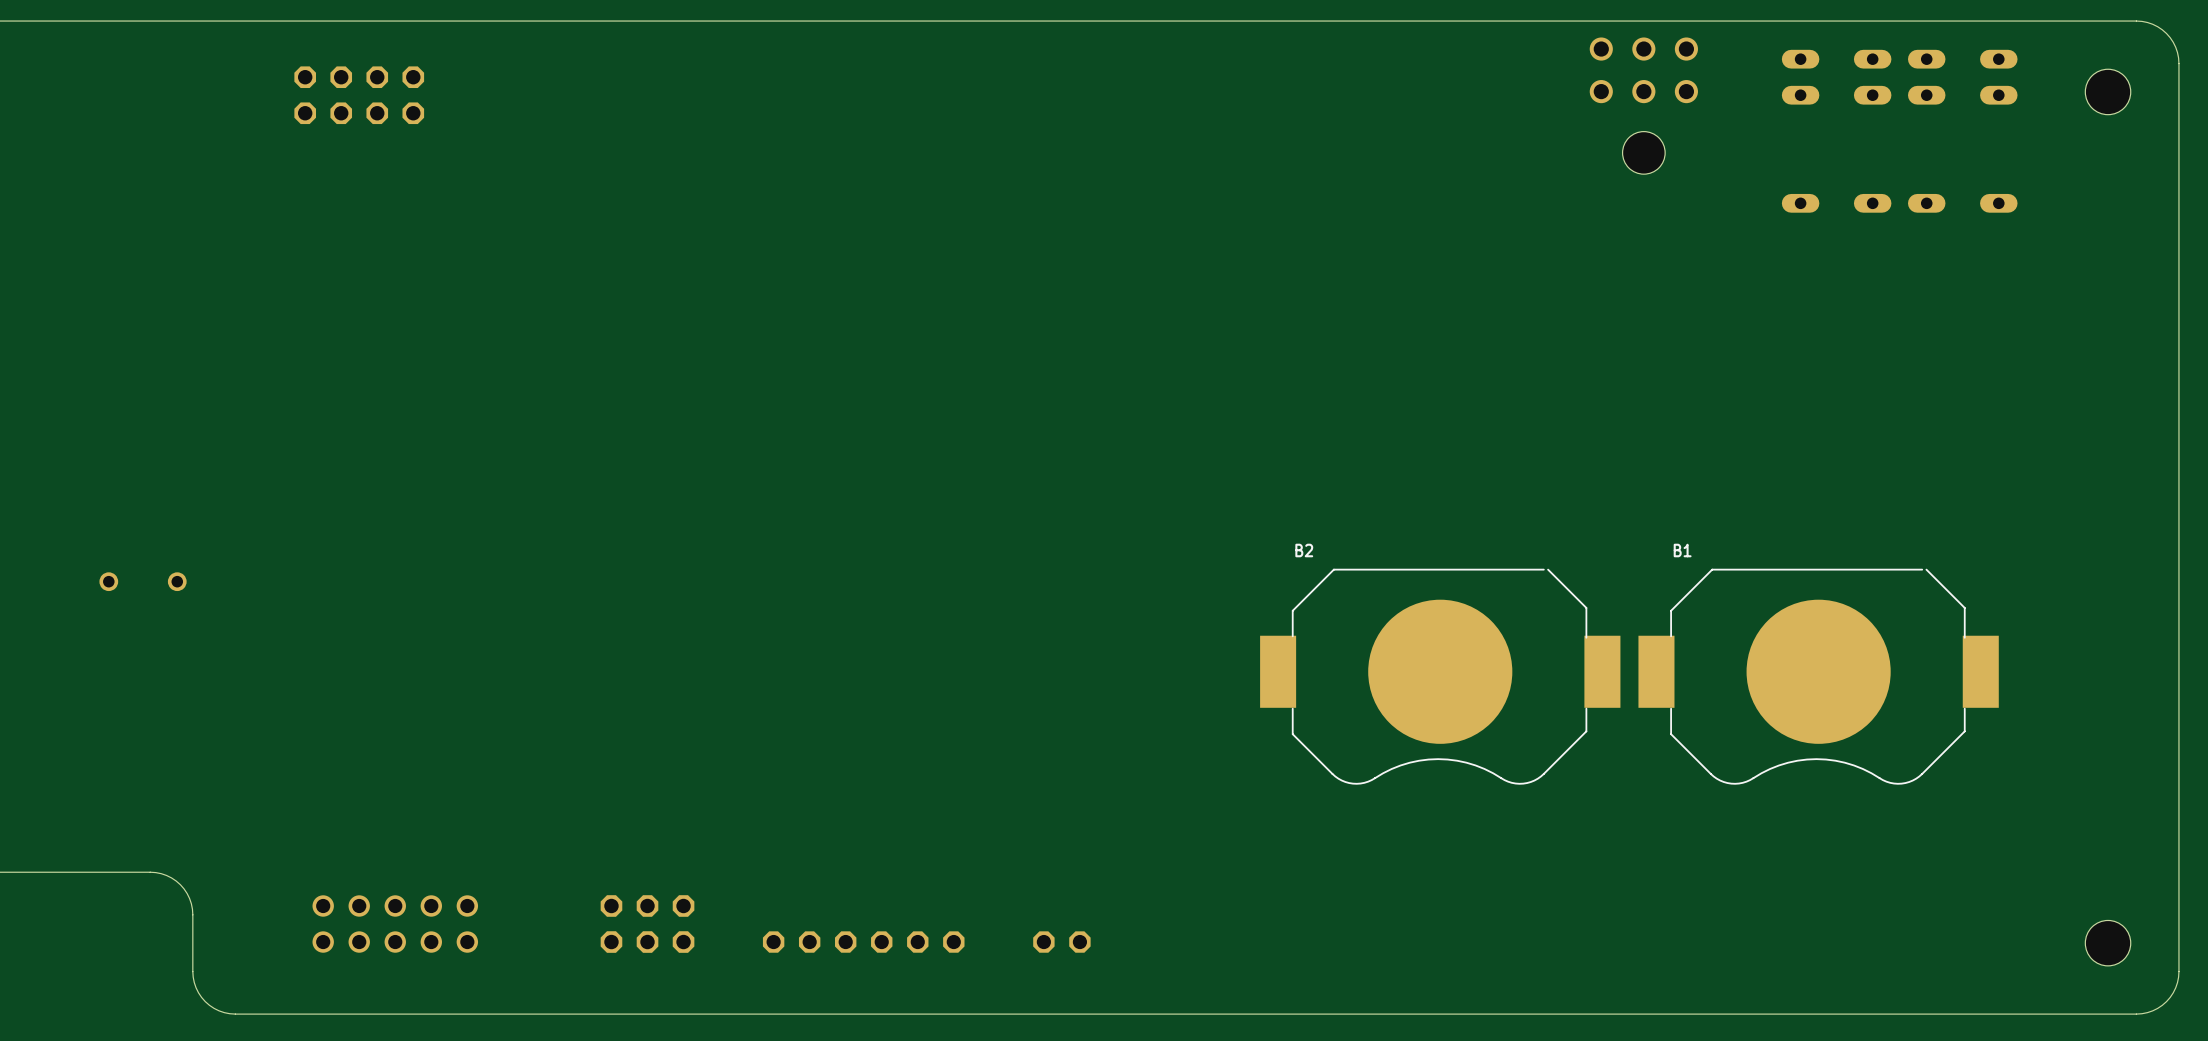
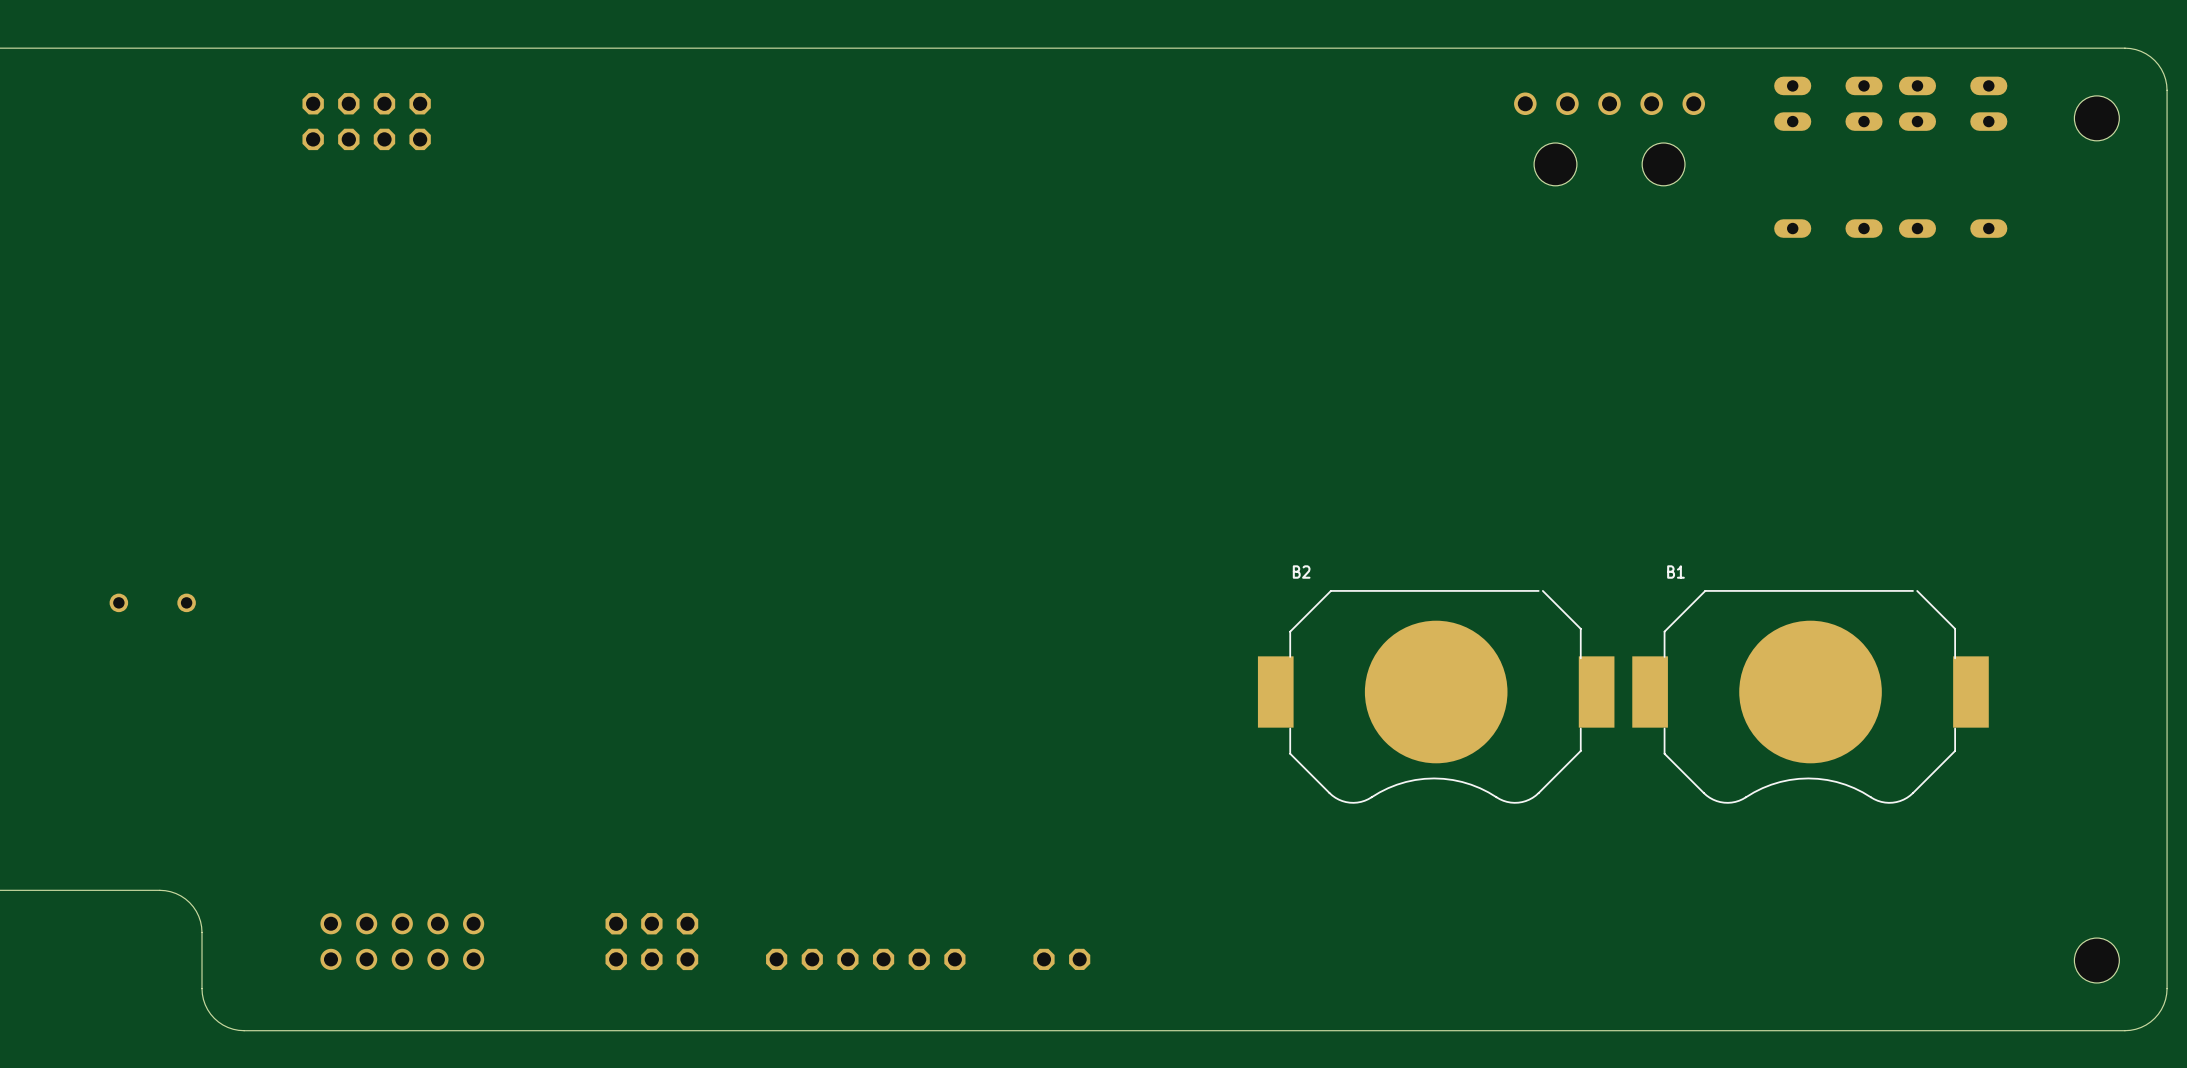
part: (1643, 105) -> none
part: none -> (1609, 139)

